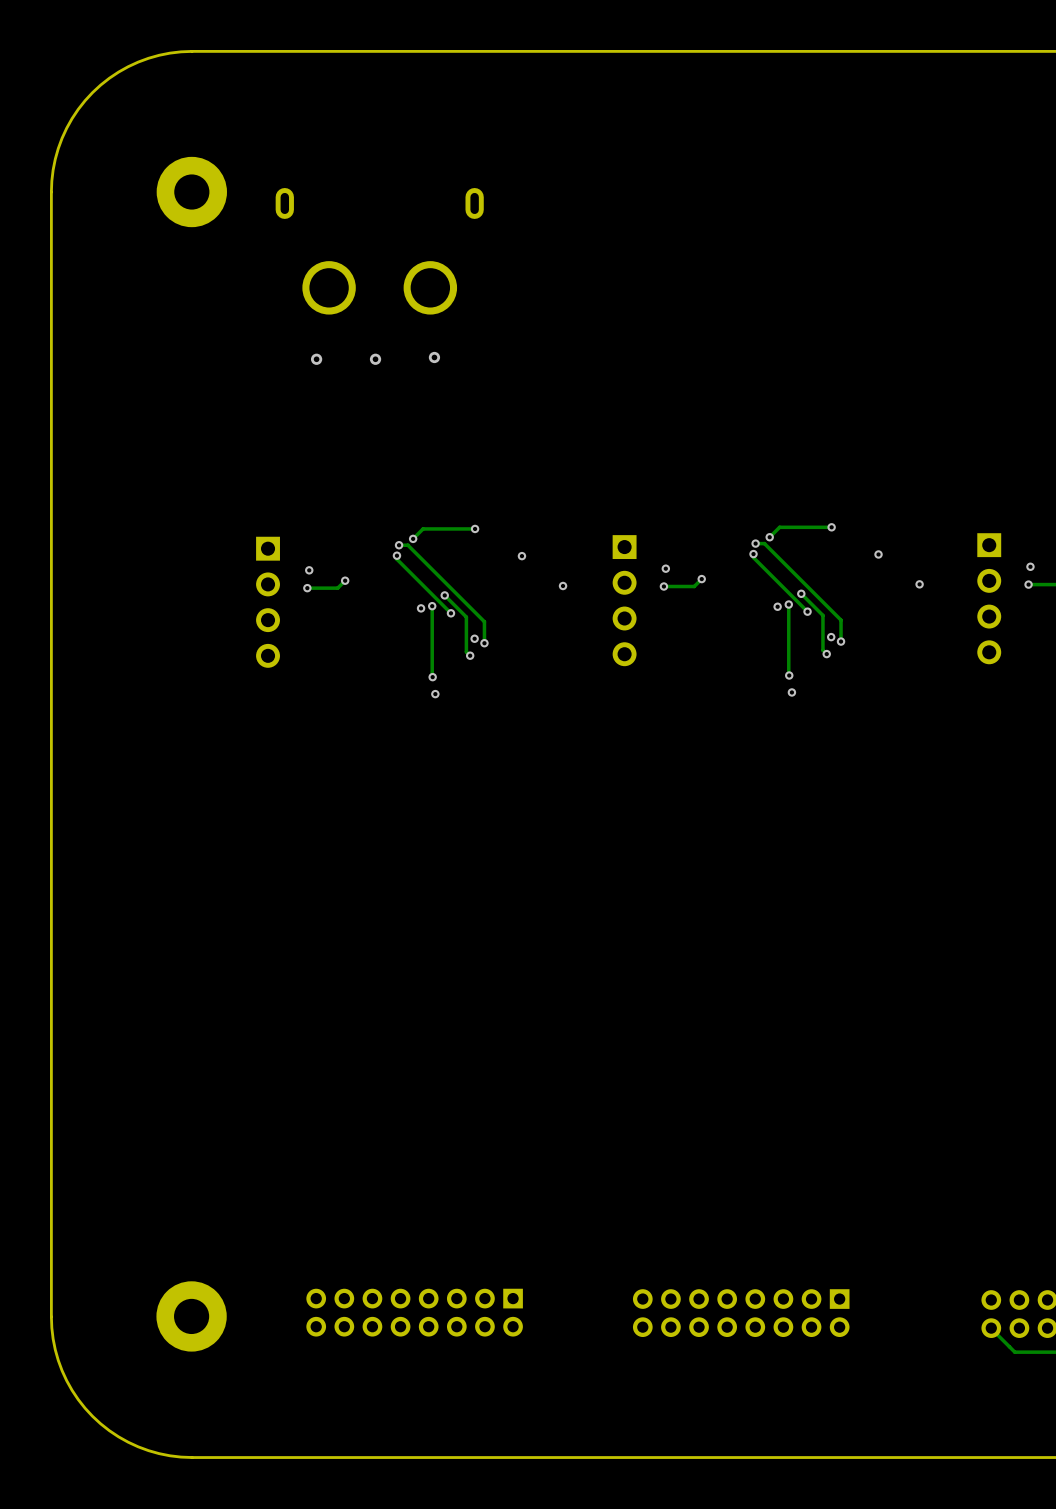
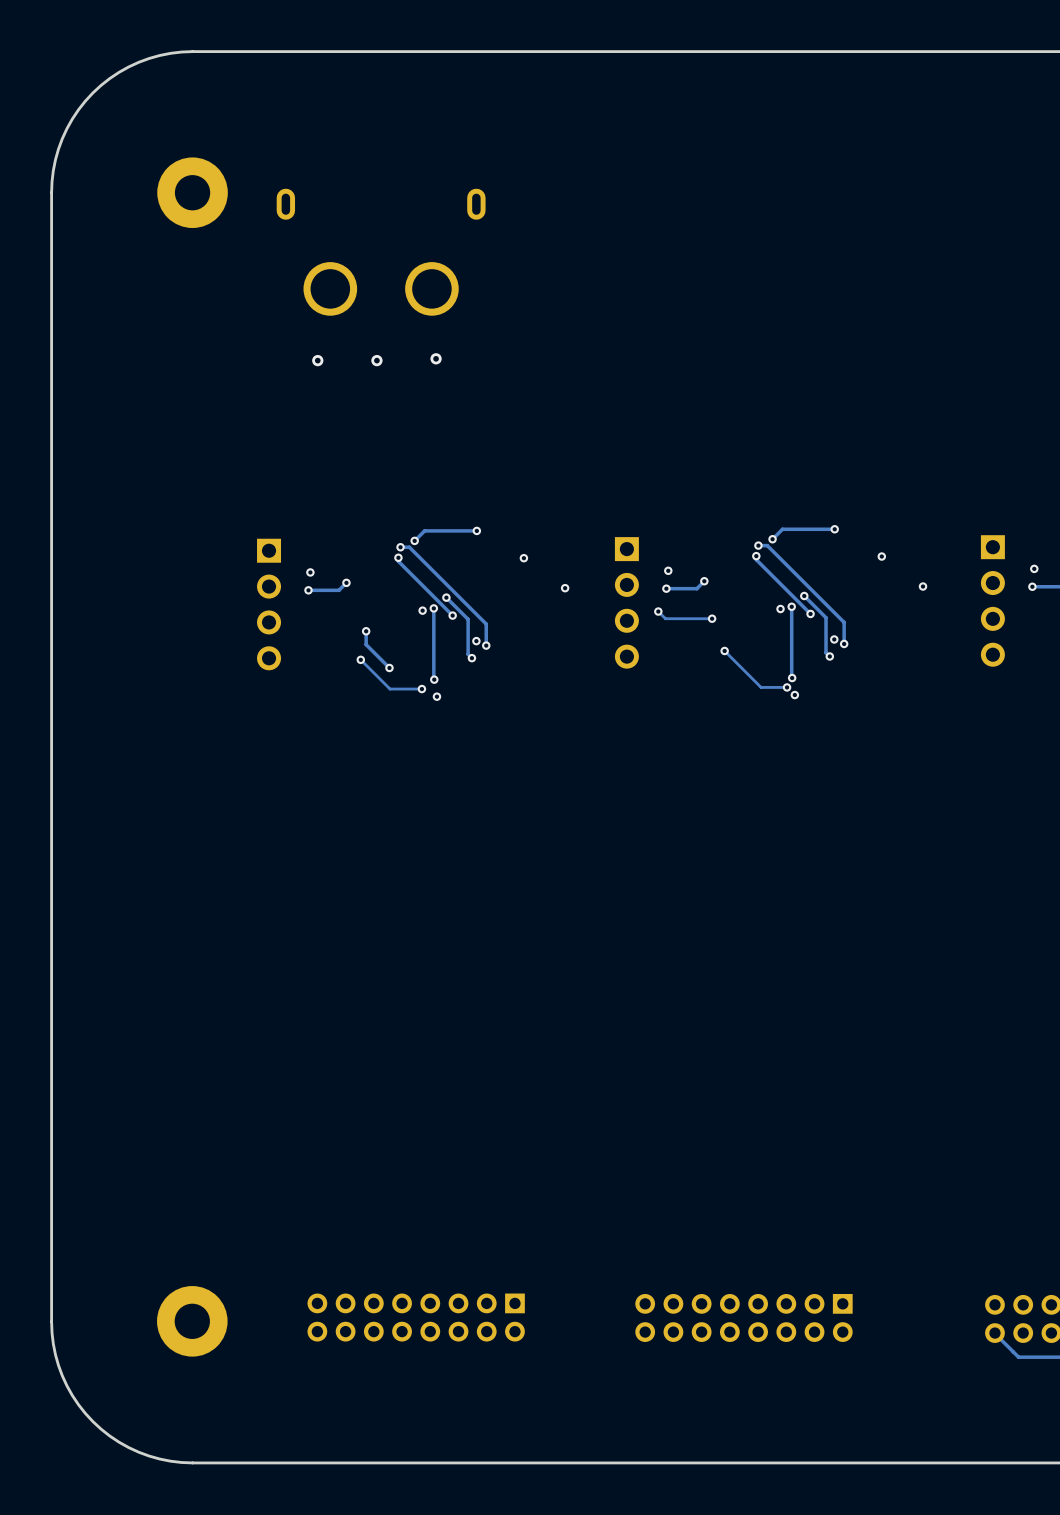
track: none -> (658, 611) (665, 618) (712, 618)
via: none -> (658, 611)
via: none -> (712, 618)
track: none -> (366, 631) (366, 644) (389, 667)
via: none -> (366, 631)
track: none -> (724, 650) (761, 687) (787, 687)
via: none -> (724, 650)
track: none -> (360, 659) (390, 689) (421, 689)
via: none -> (360, 659)
via: none -> (389, 667)
via: none -> (787, 687)
via: none -> (421, 689)

